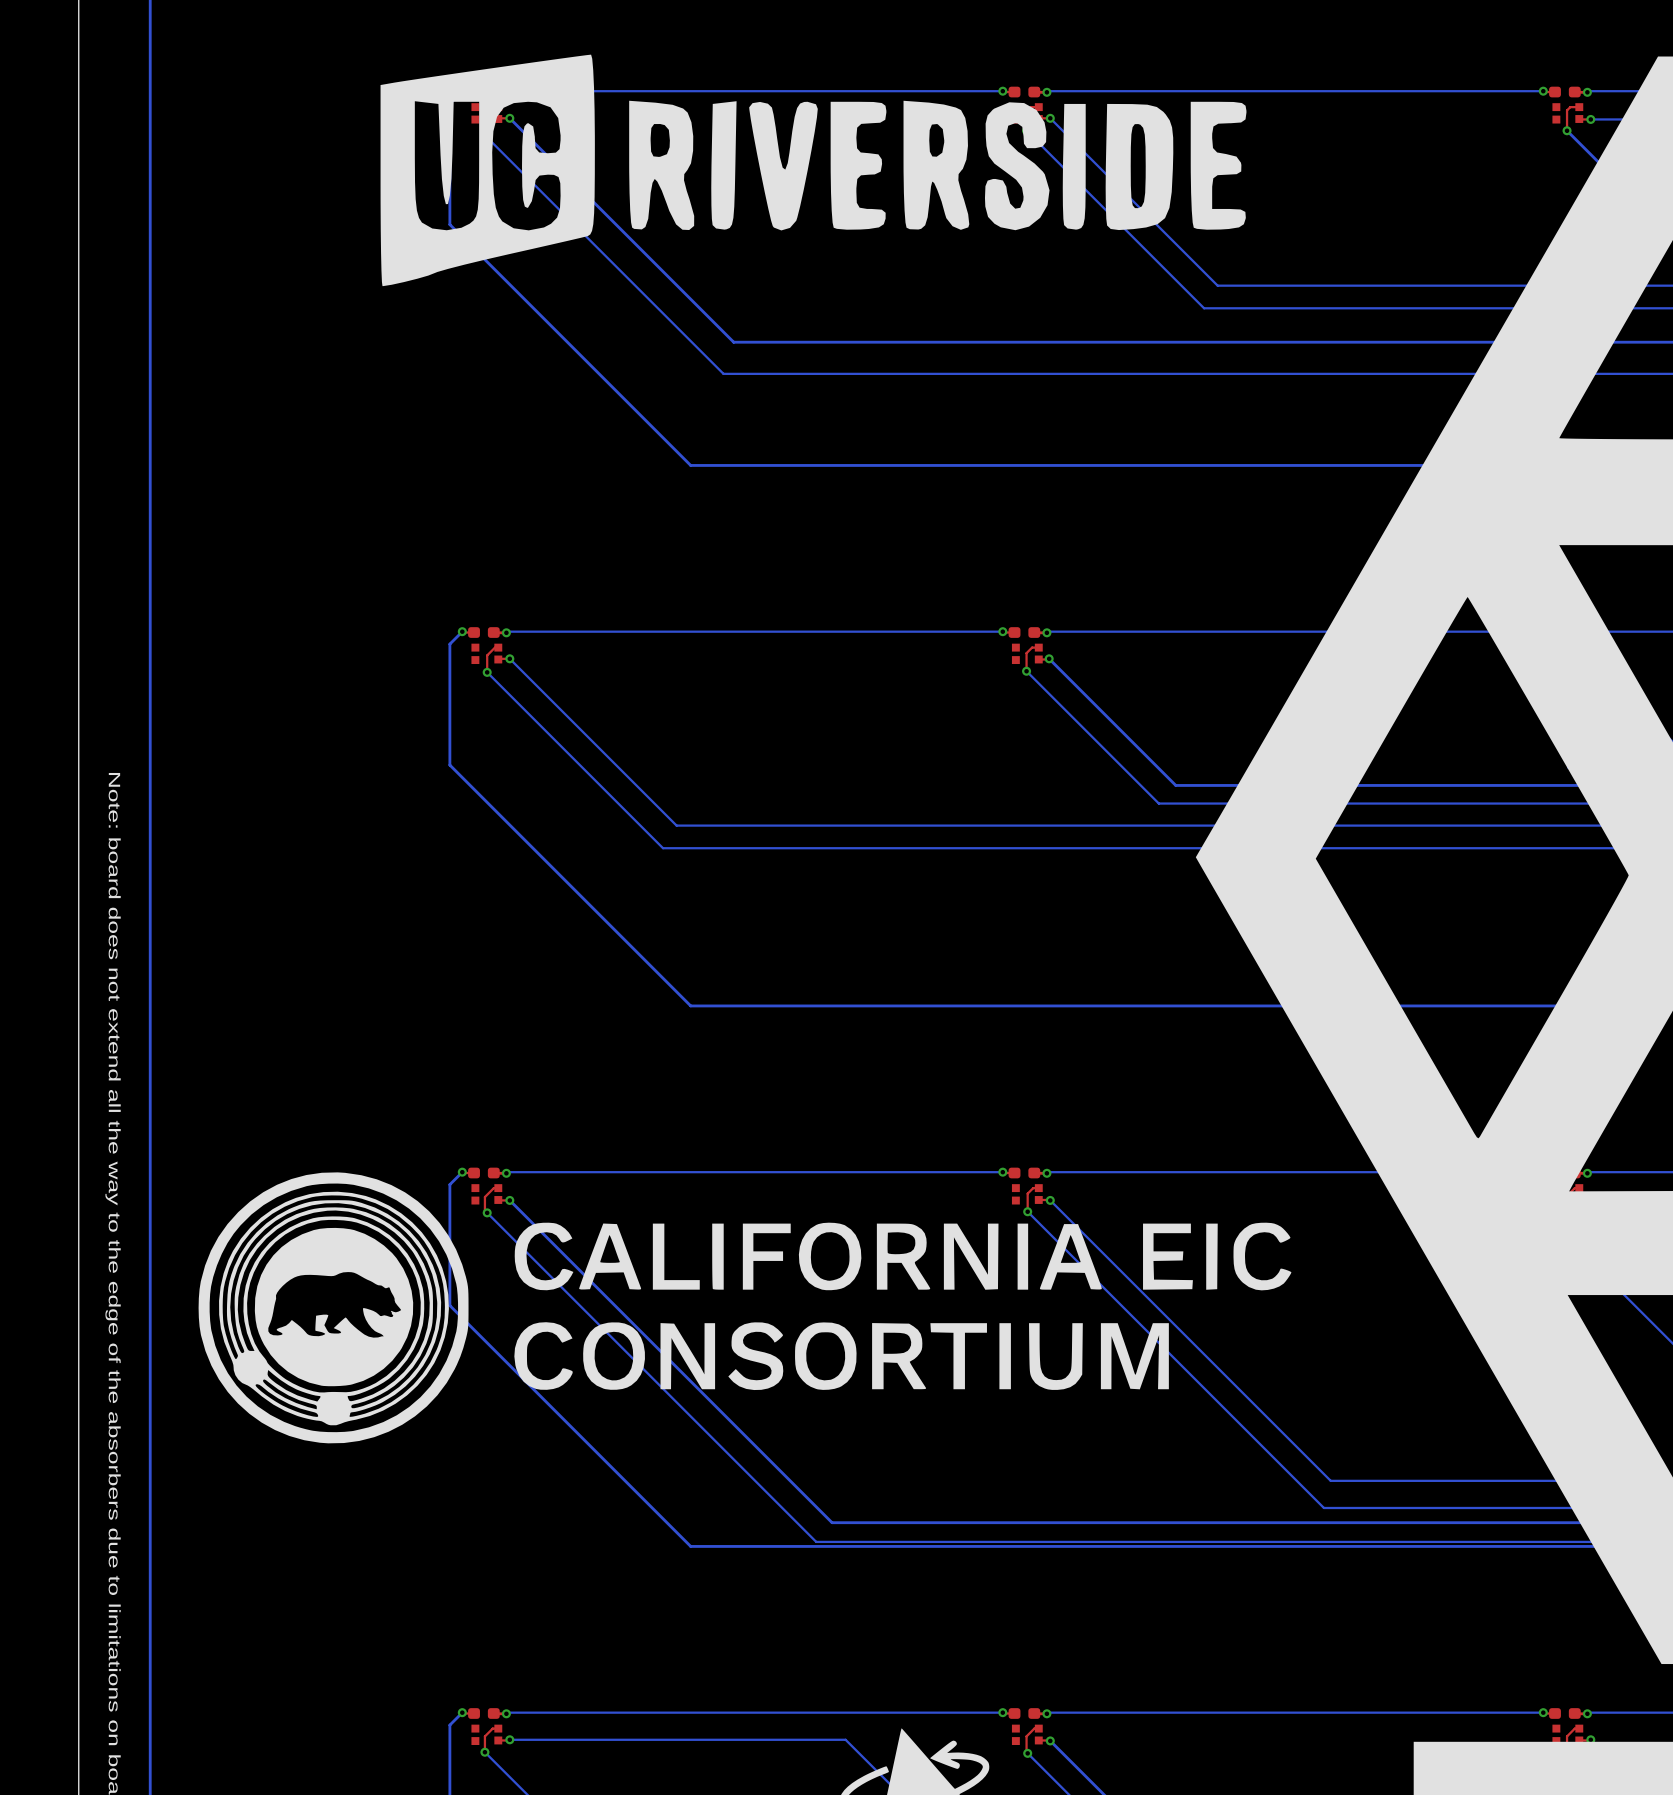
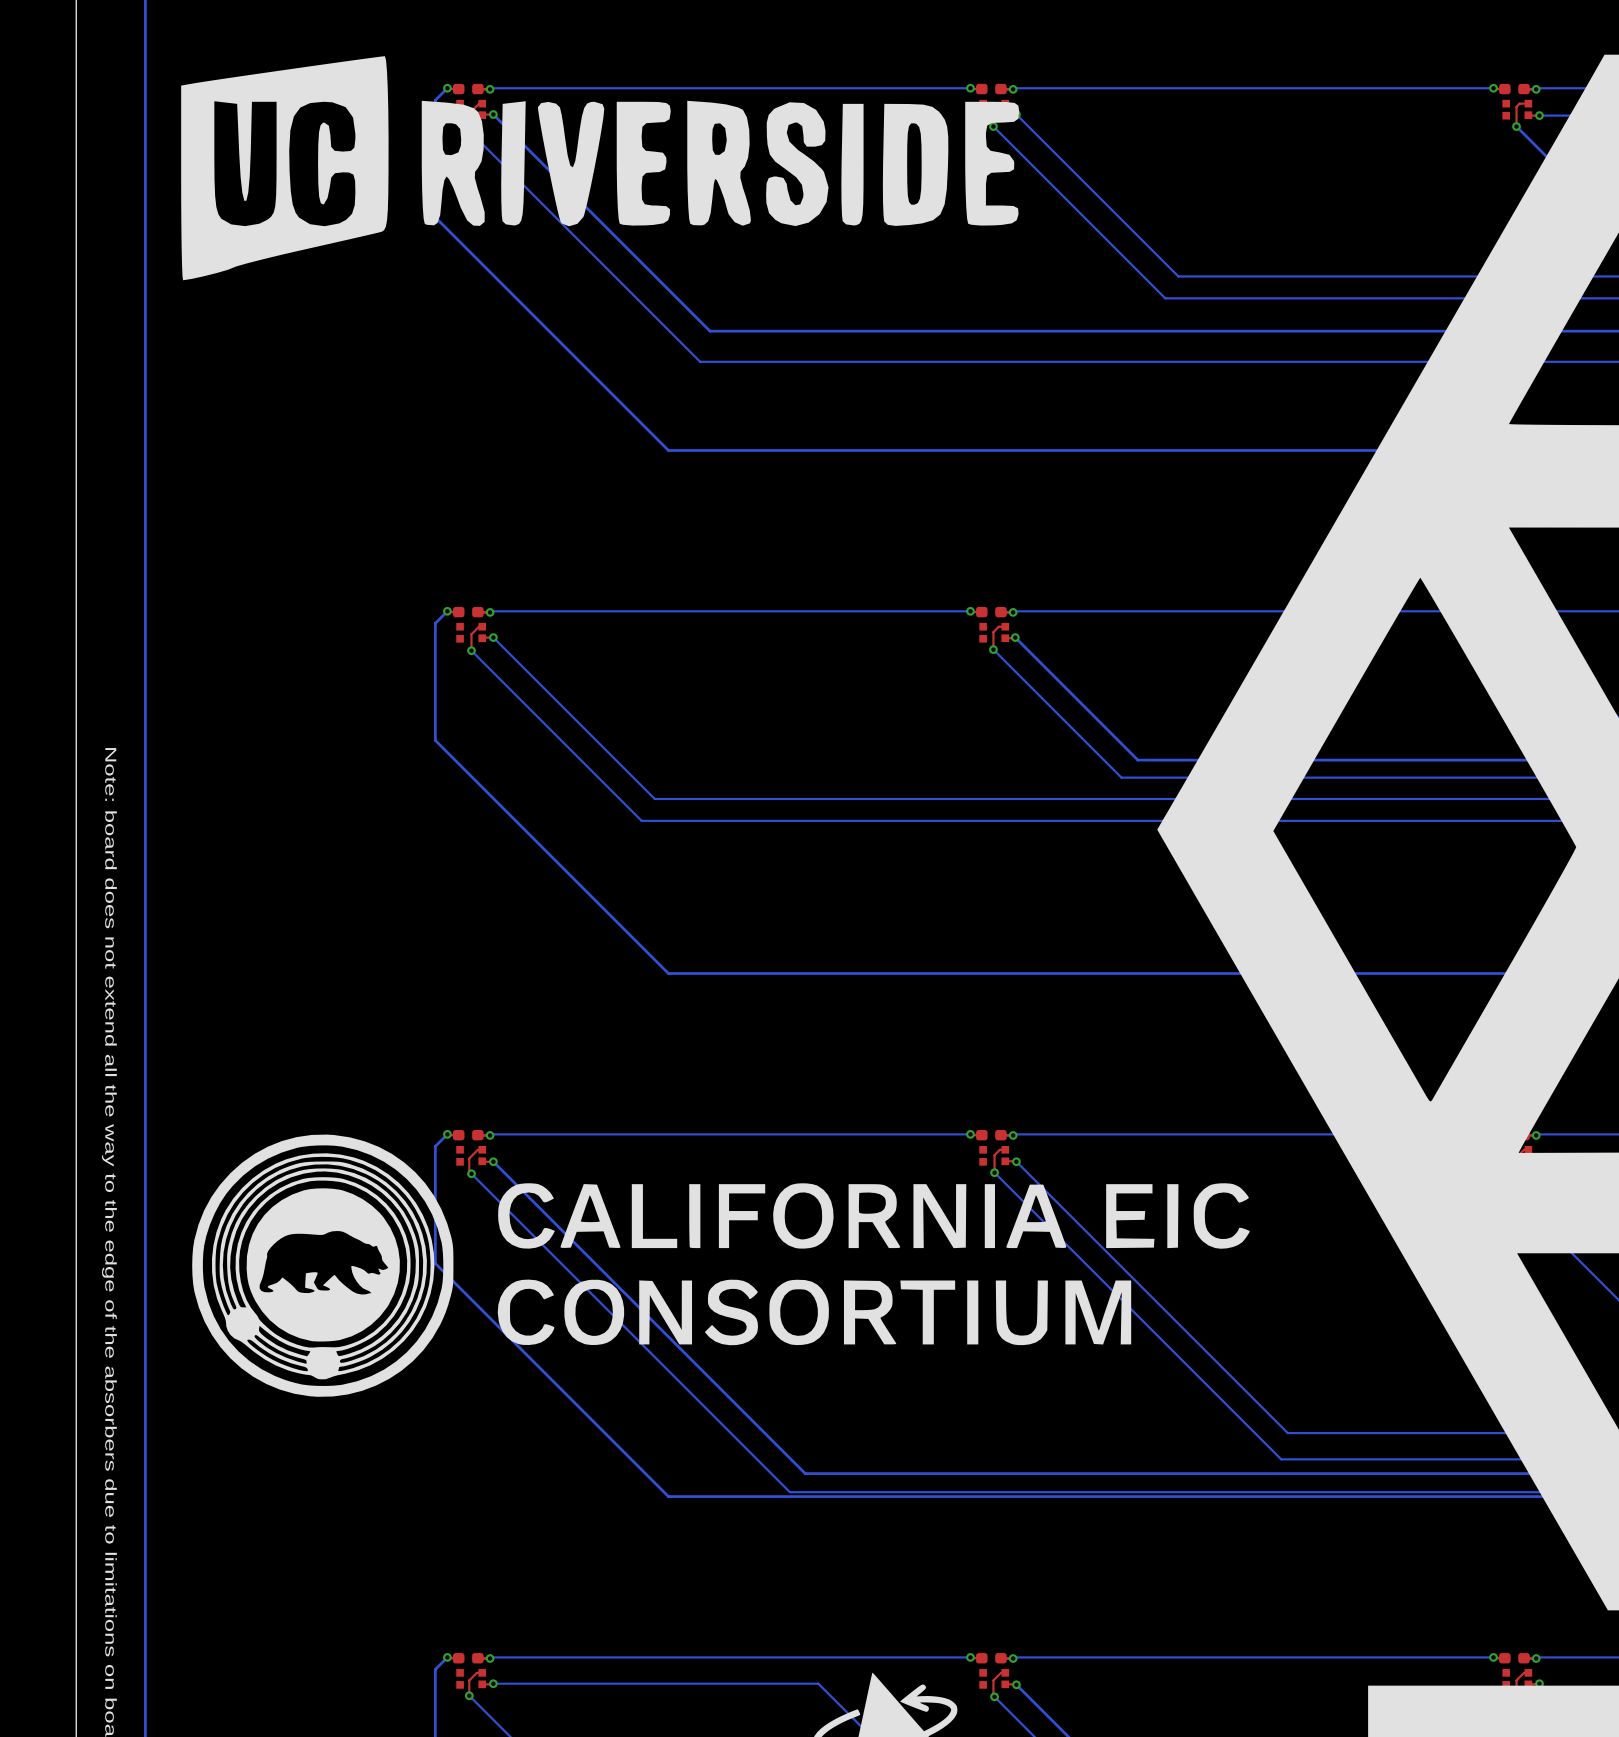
drawing position: (813, 170) -> (600, 168)

